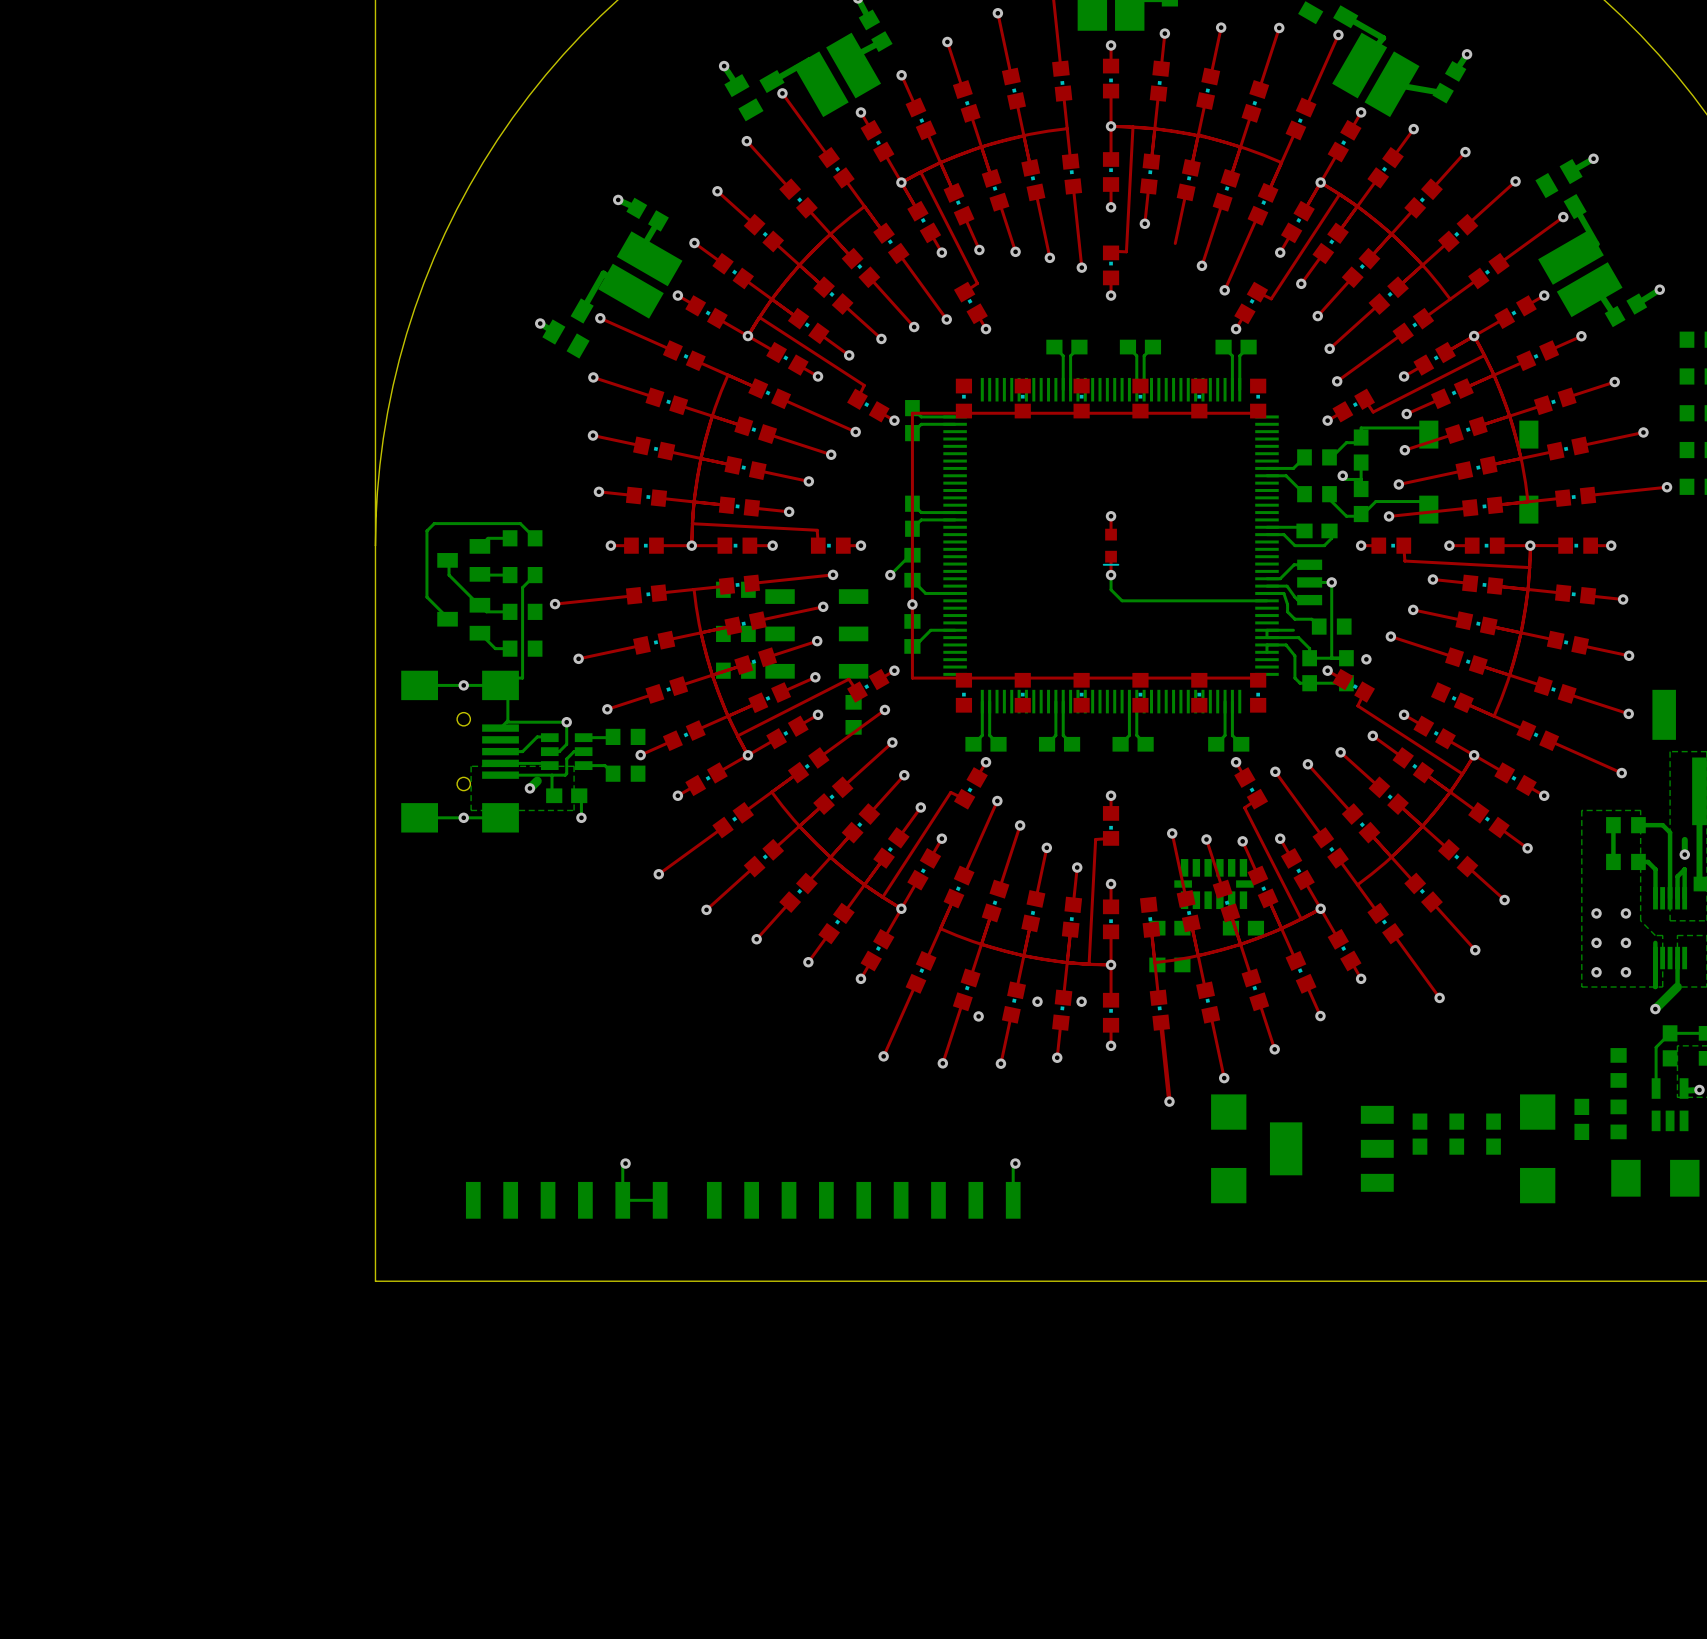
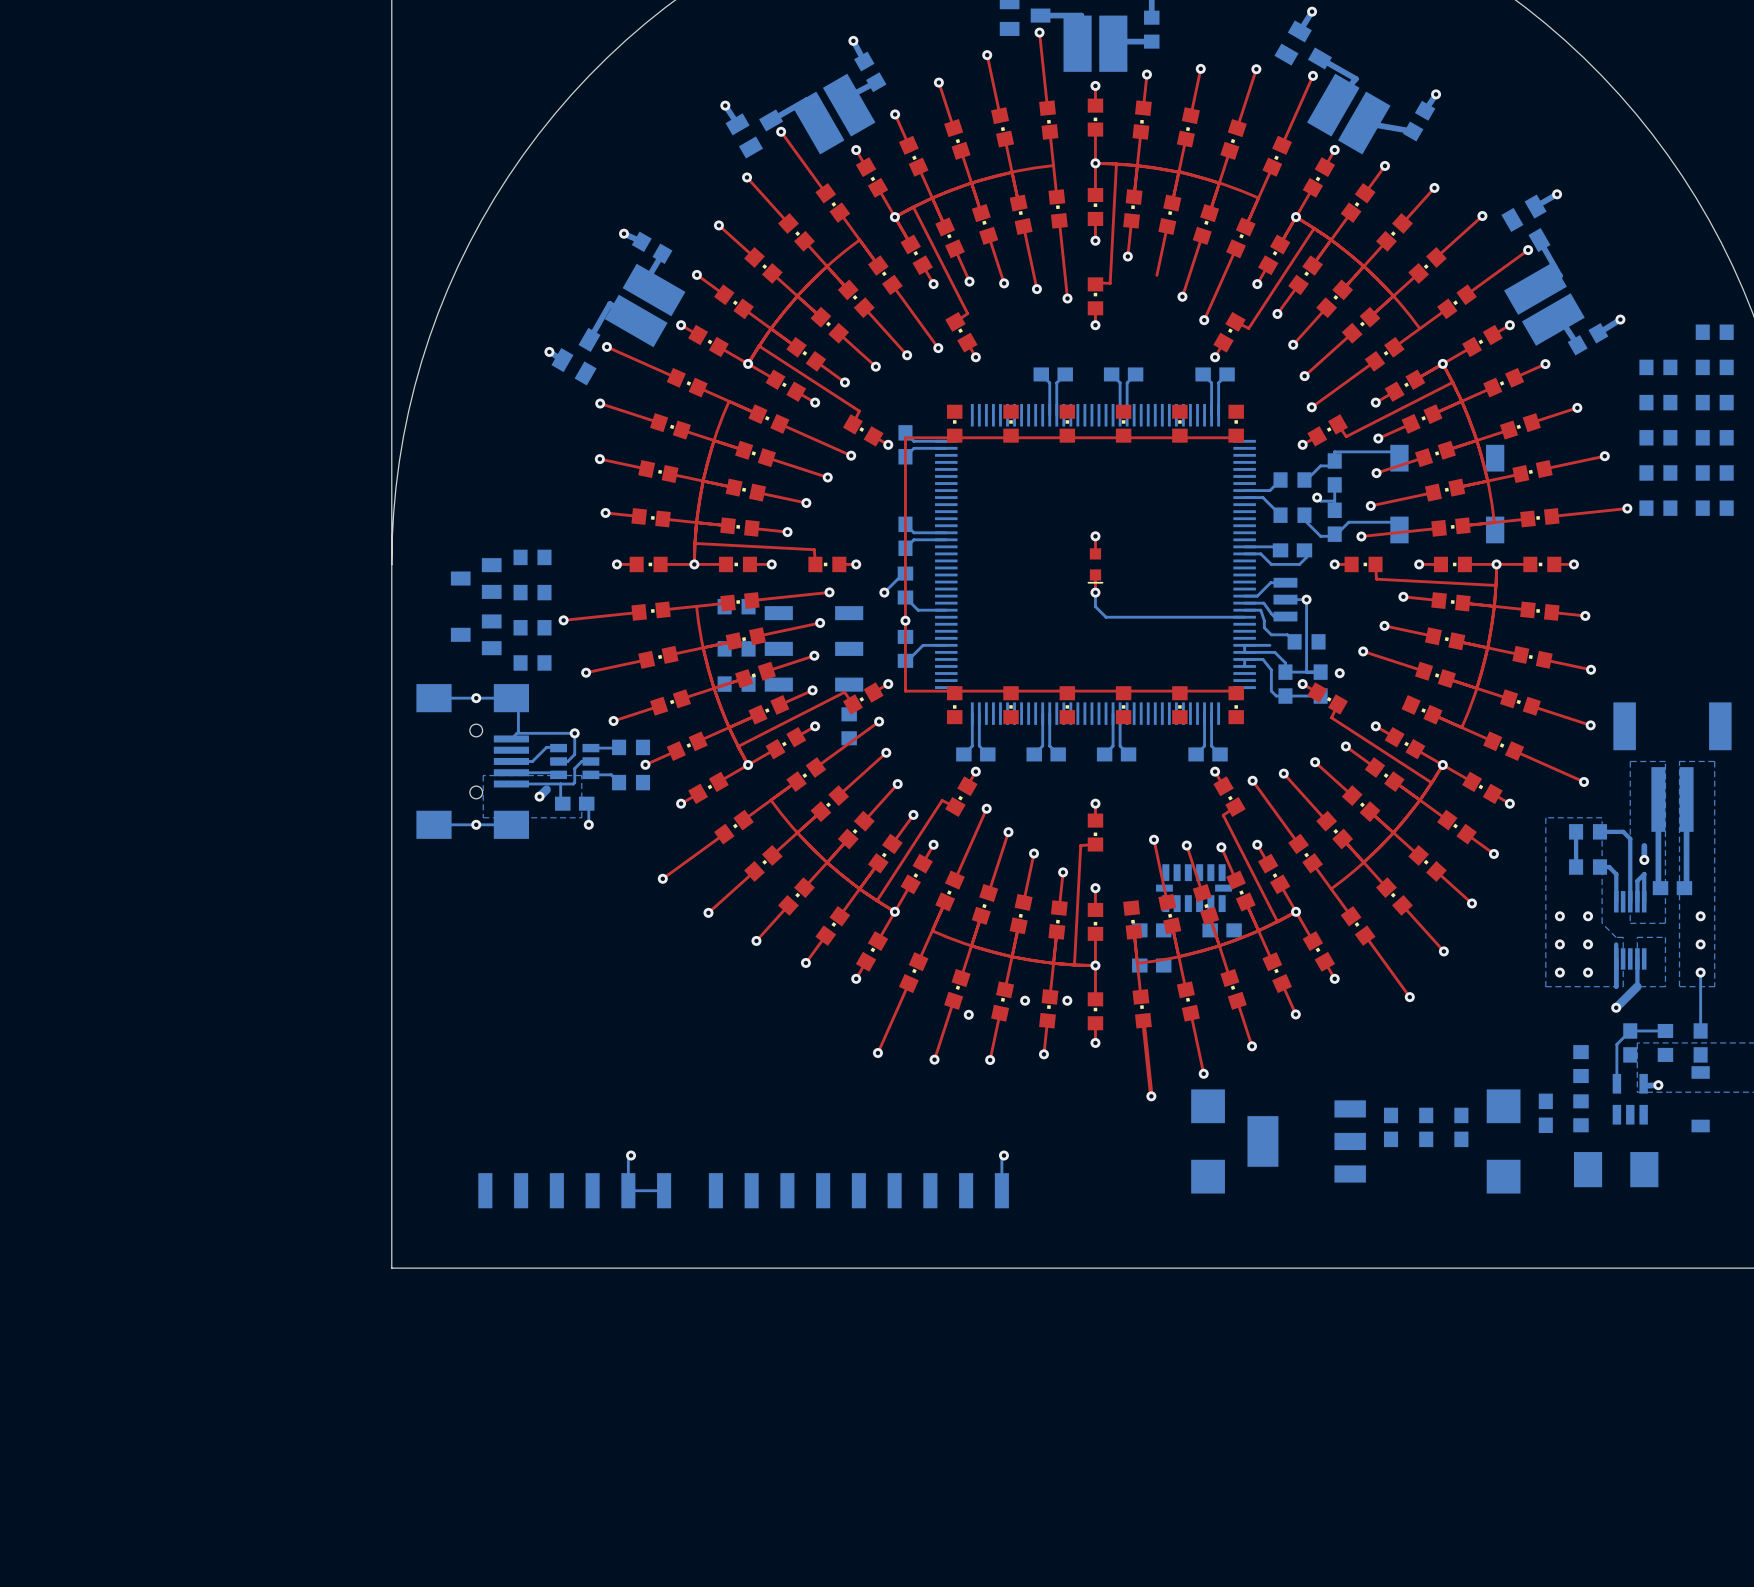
bottom track: (510, 538) (488, 538) (479, 546) -> none
bottom track: (535, 538) (520, 523) (434, 523) (426, 530) (426, 597) (447, 619) -> none
bottom track: (447, 560) (449, 575) (486, 611) (510, 611) -> none
bottom track: (479, 574) (510, 575) -> none
bottom track: (535, 575) (522, 587) (522, 678) (507, 678) (500, 685) -> none
bottom track: (479, 633) (495, 648) (510, 648) -> none

